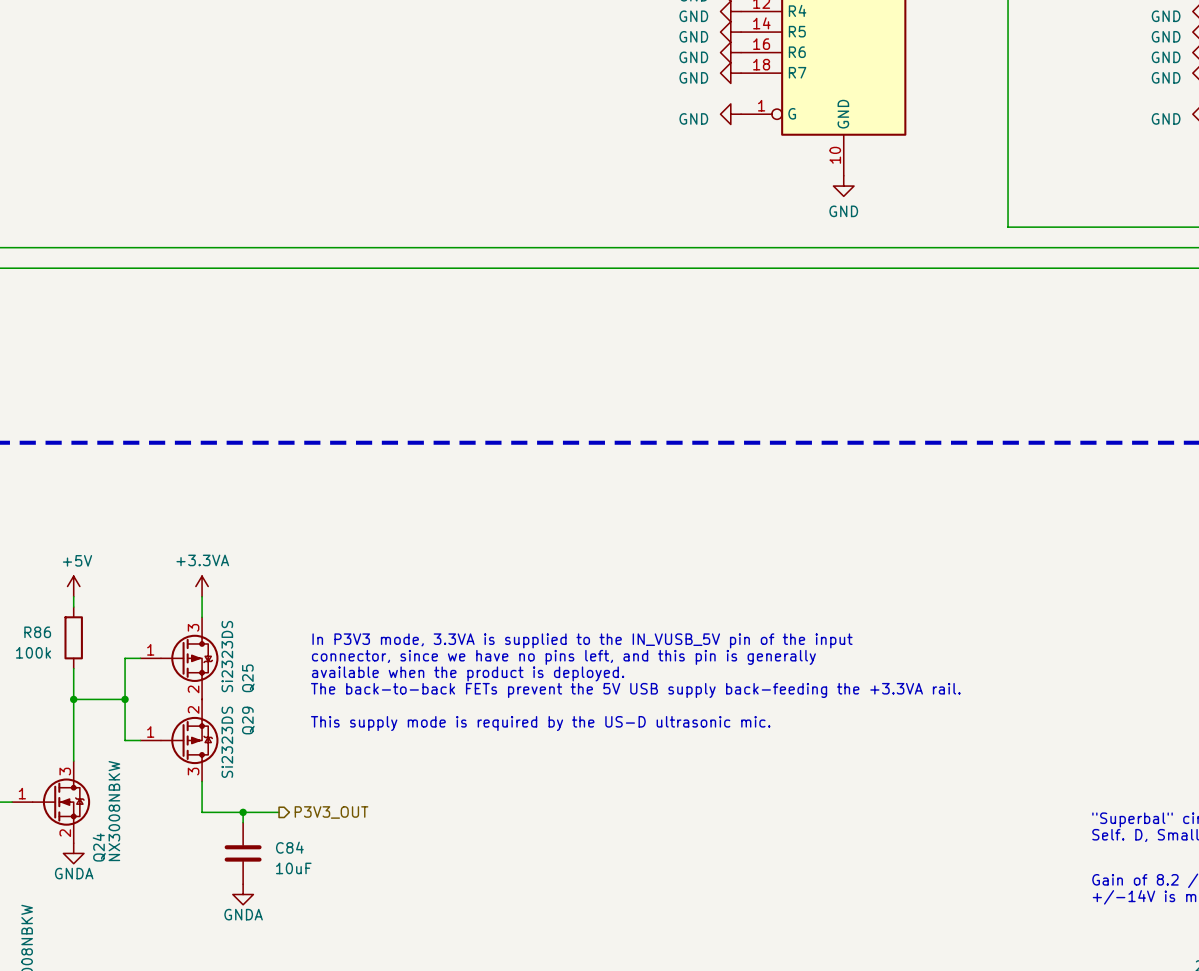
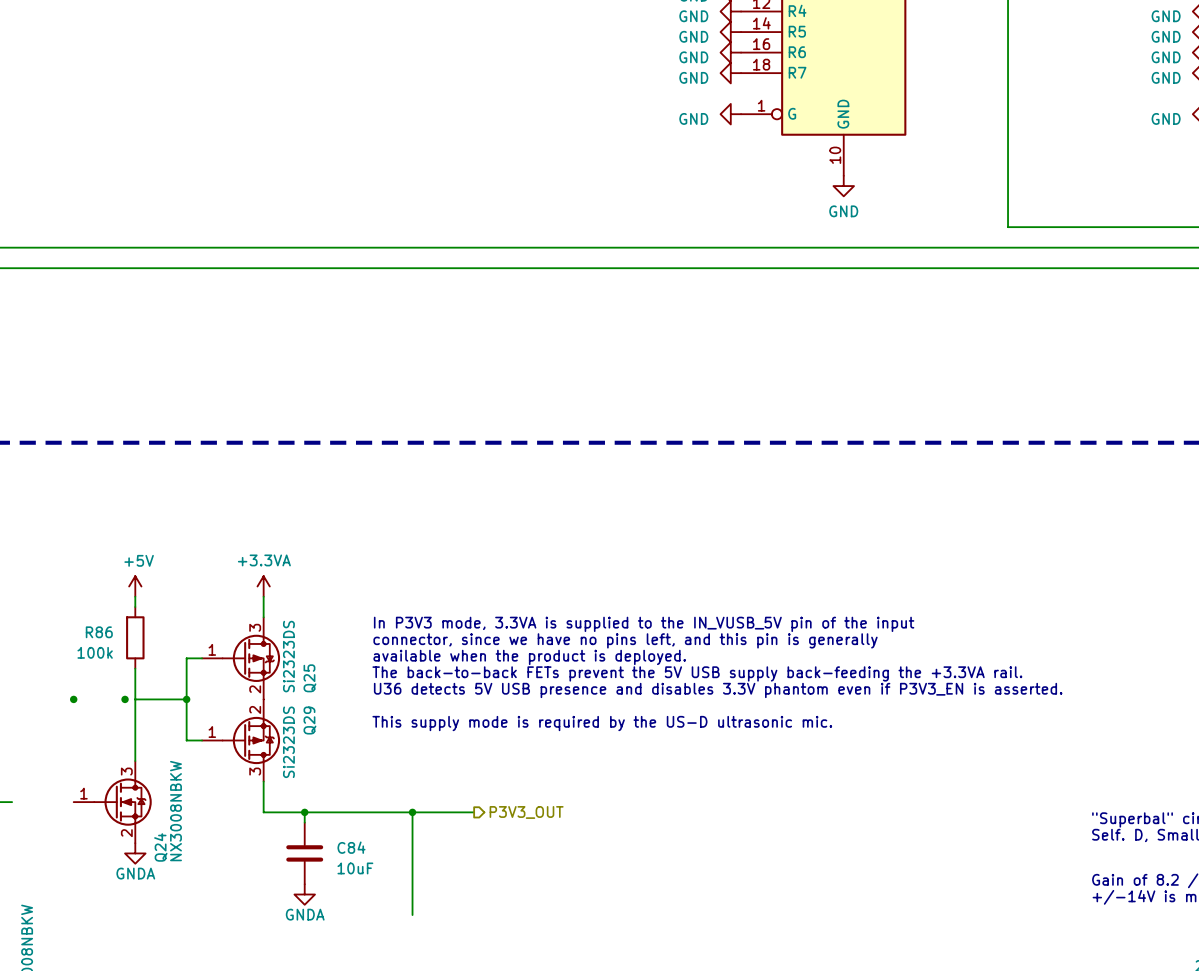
power symbol position: +5V (73, 586) -> +5V (135, 586)
power symbol position: +3.3VA (202, 586) -> +3.3VA (263, 586)
wire: (73, 596) (73, 607) -> (135, 596) (135, 607)
wire: (202, 596) (202, 617) -> (263, 596) (263, 617)
R86 position: (73, 637) -> (135, 637)
text position: In P3V3 mode, 3.3VA is supplied to the IN_VUSB_5V pin of the input (582, 640) -> In P3V3 mode, 3.3VA is supplied to the IN_VUSB_5V pin of the input (644, 624)
text position: connector, since we have no pins left, and this pin is generally (563, 657) -> connector, since we have no pins left, and this pin is generally (625, 640)
wire: (140, 658) (125, 658) (125, 740) (140, 740) -> (202, 658) (186, 658) (186, 740) (202, 740)
Q25 position: (179, 658) -> (241, 658)
wire: (73, 668) (73, 761) -> (135, 668) (135, 761)
text position: available when the product is deployed. (468, 673) -> available when the product is deployed. (529, 657)
text position: The back-to-back FETs prevent the 5V USB supply back-feeding the +3.3VA rail. (635, 690) -> The back-to-back FETs prevent the 5V USB supply back-feeding the +3.3VA rail. (697, 673)
text: none -> U36 detects 5V USB presence and disables 3.3V phantom even if P3V3_EN is asserted. (718, 690)
wire: (73, 699) (125, 699) -> (135, 699) (186, 699)
junction: none -> (186, 699)
text position: This supply mode is required by the US-D ultrasonic mic. (540, 723) -> This supply mode is required by the US-D ultrasonic mic. (602, 723)
Q29 position: (179, 740) -> (241, 740)
wire: (202, 781) (202, 812) (263, 812) -> (263, 781) (263, 812)
Q24 position: (51, 802) -> (112, 802)
wire: (243, 812) (243, 822) -> (304, 812) (304, 822)
junction: (243, 812) -> none
wire: none -> (279, 812) (474, 812)
junction: none -> (304, 812)
hierarchical label position: P3V3_OUT (331, 812) -> P3V3_OUT (526, 812)
wire: none -> (412, 812) (412, 915)
junction: none -> (412, 812)
power symbol: GNDA (73, 853) -> none
power symbol: none -> GNDA (135, 853)
C84 position: (243, 853) -> (304, 853)
power symbol: GNDA (243, 894) -> none
power symbol: none -> GNDA (304, 894)

